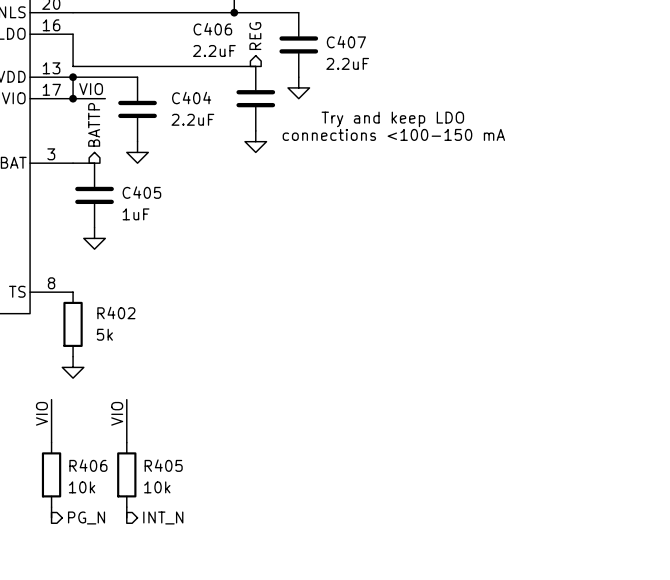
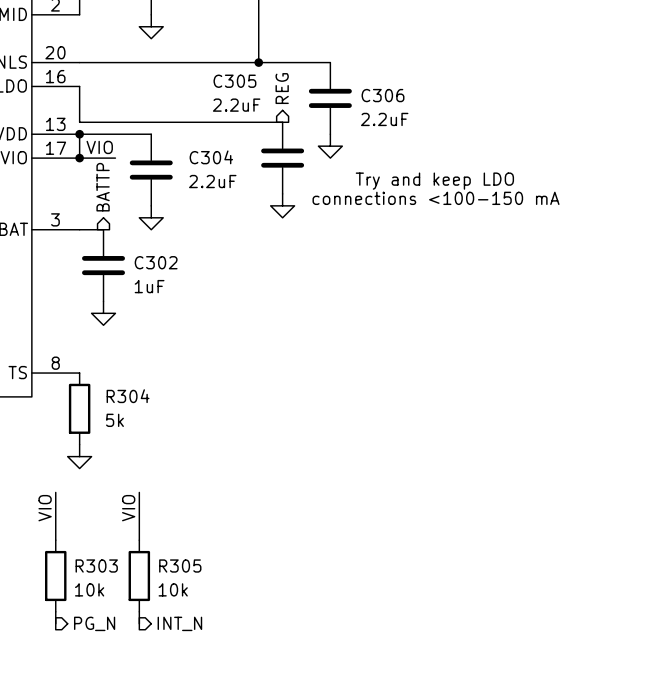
C406 name: C406 (212, 29) -> C305 (234, 81)
C407 name: C407 (346, 42) -> C306 (383, 95)
C404 name: C404 (191, 98) -> C304 (211, 157)
C405 name: C405 (141, 192) -> C302 (156, 262)
R402 name: R402 (116, 312) -> R304 (128, 396)
R406 name: R406 (88, 465) -> R303 (96, 566)
R405 name: R405 (163, 465) -> R305 (180, 566)

